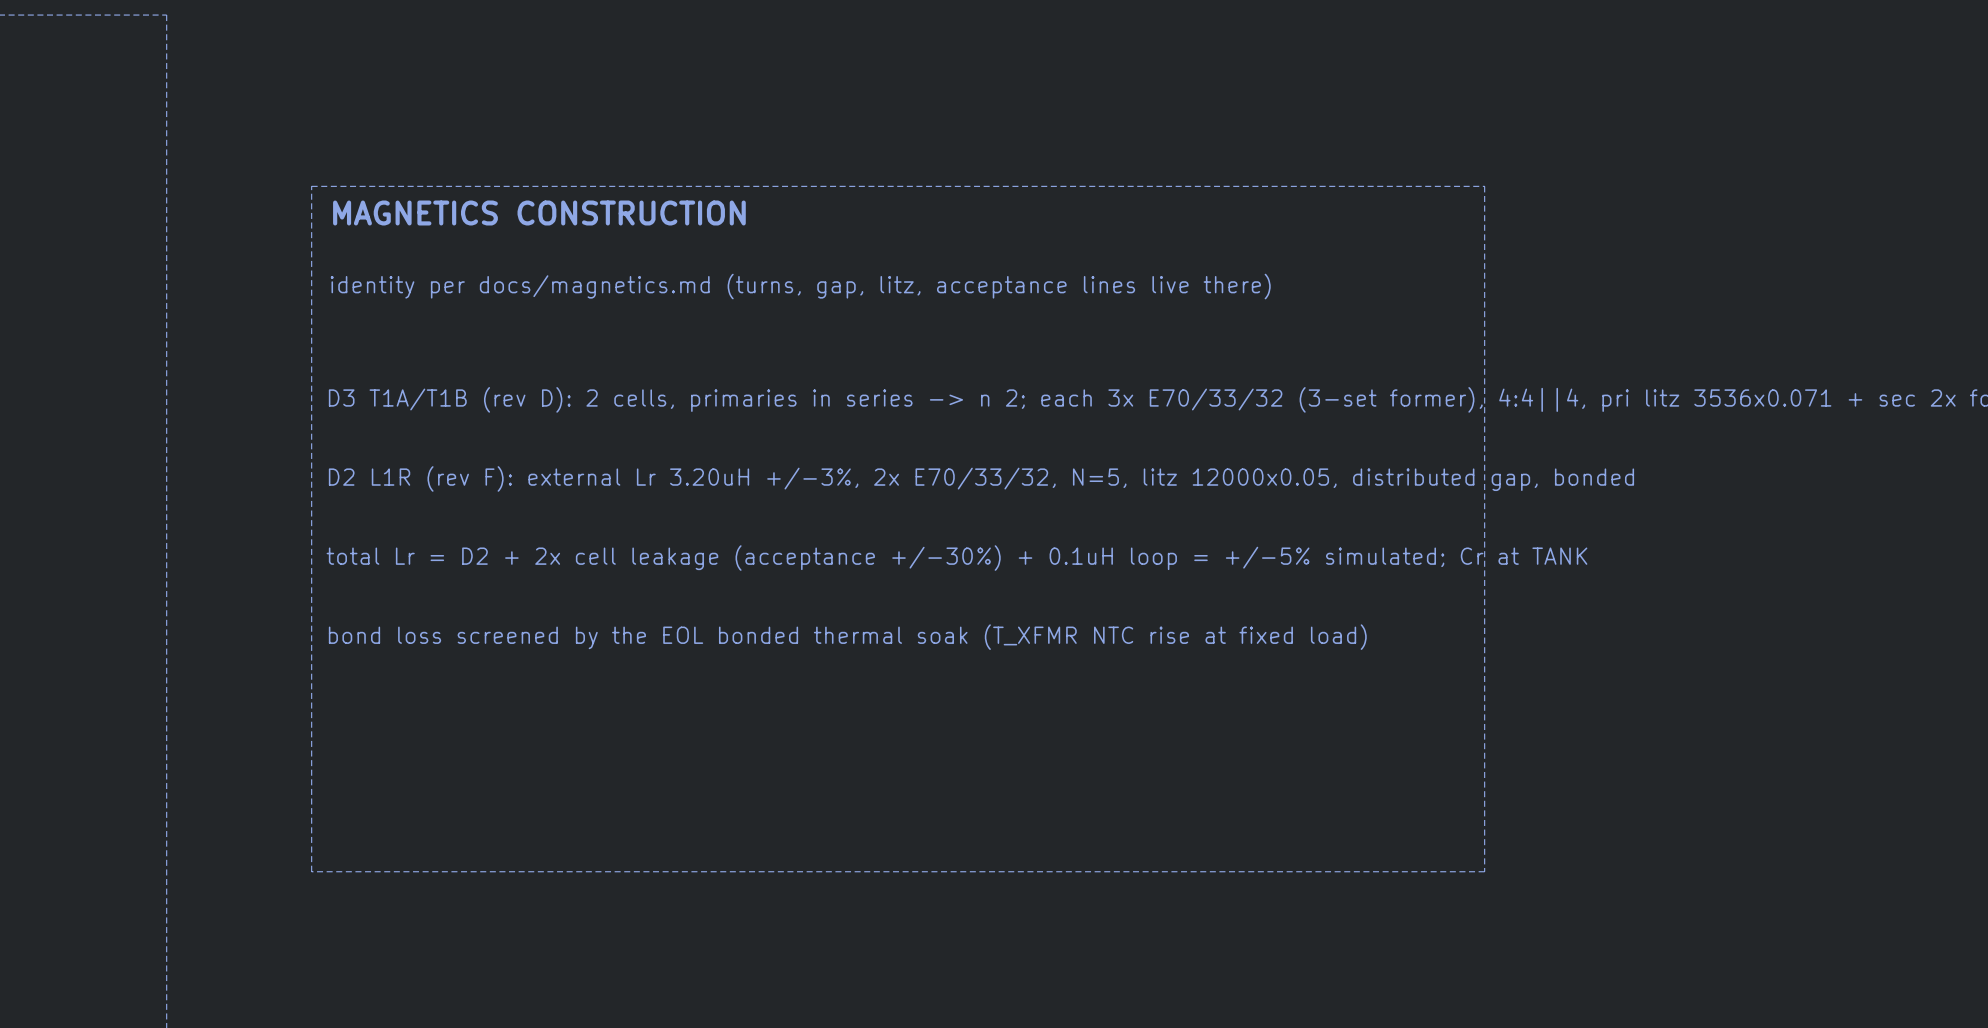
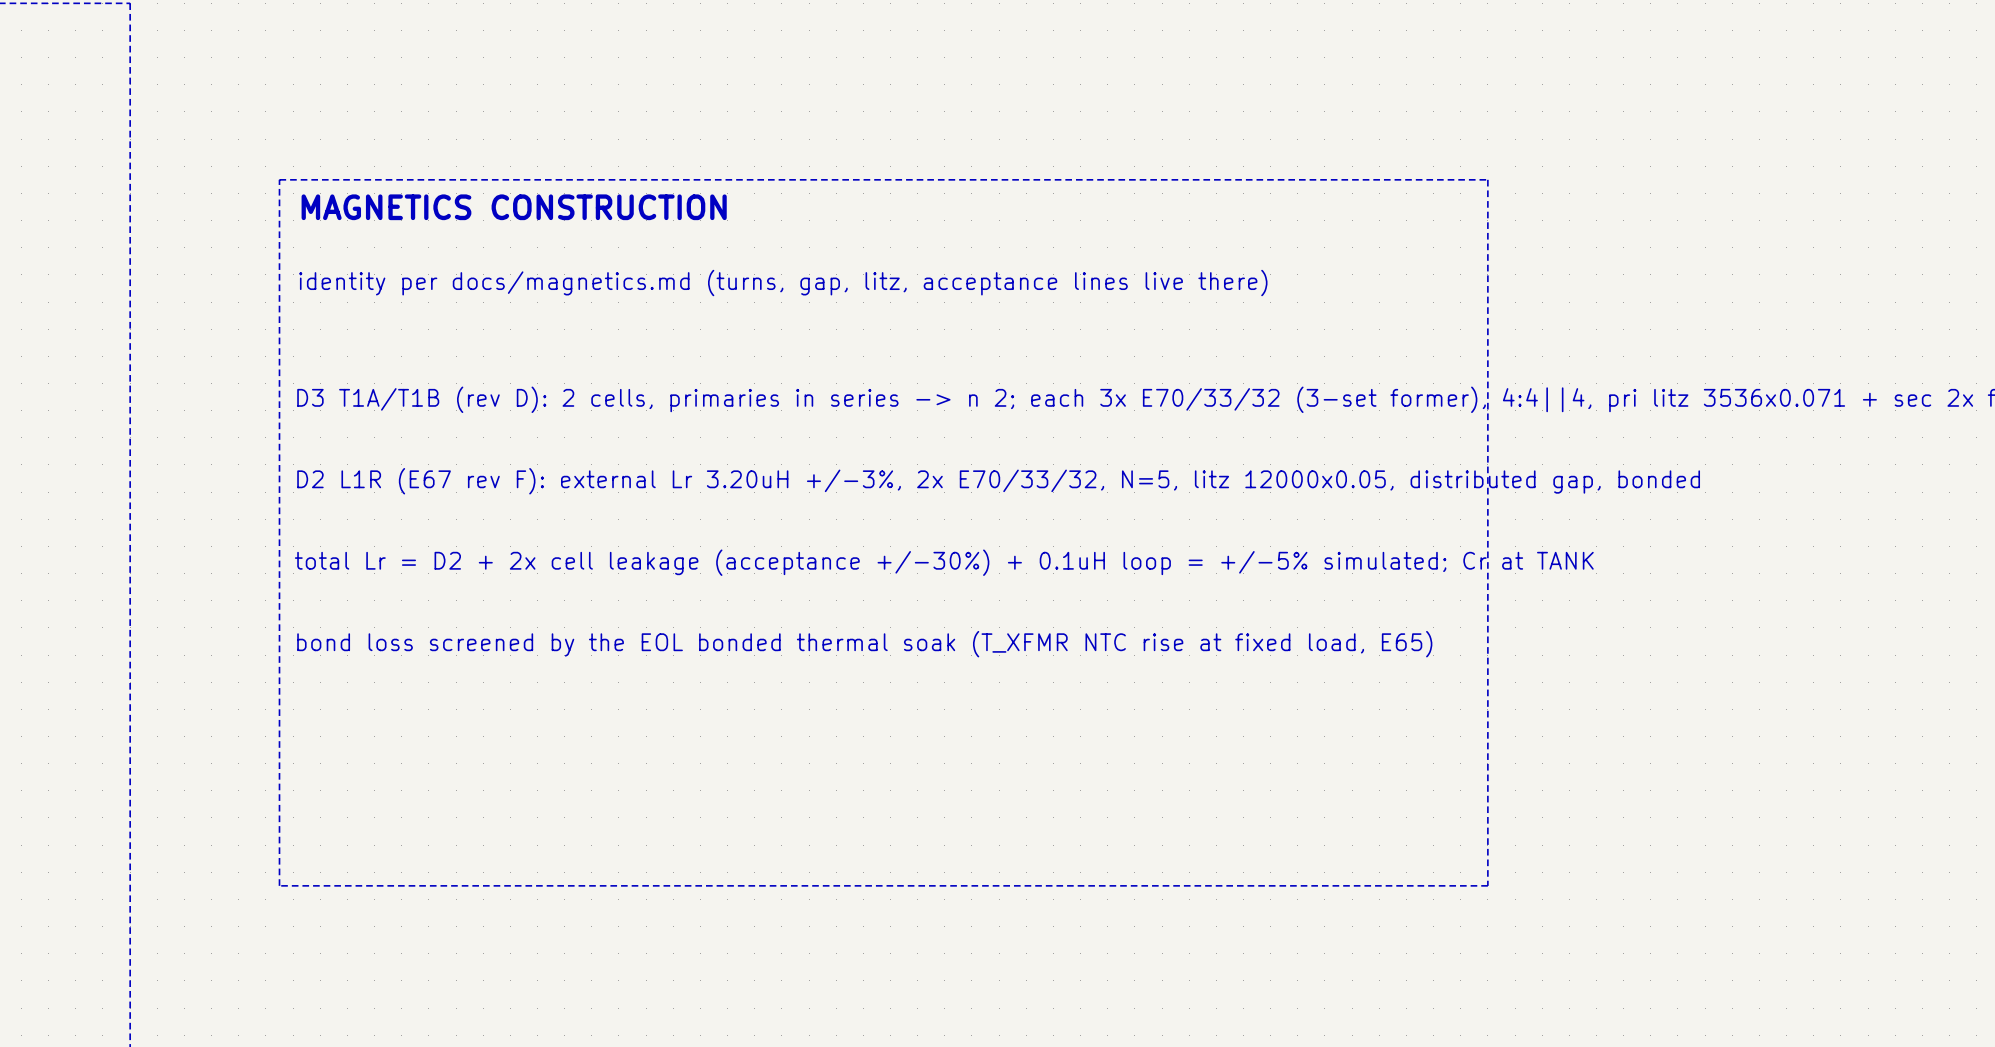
text: D2 L1R (rev F): external Lr 3.20uH +/-3%, 2x E70/33/32, N=5, litz 12000x0.05, distributed gap, bonded (981, 478) -> D2 L1R (E67 rev F): external Lr 3.20uH +/-3%, 2x E70/33/32, N=5, litz 12000x0.05, distributed gap, bonded (998, 481)
text: bond loss screened by the EOL bonded thermal soak (T_XFMR NTC rise at fixed load) (847, 637) -> bond loss screened by the EOL bonded thermal soak (T_XFMR NTC rise at fixed load, E65) (864, 644)

